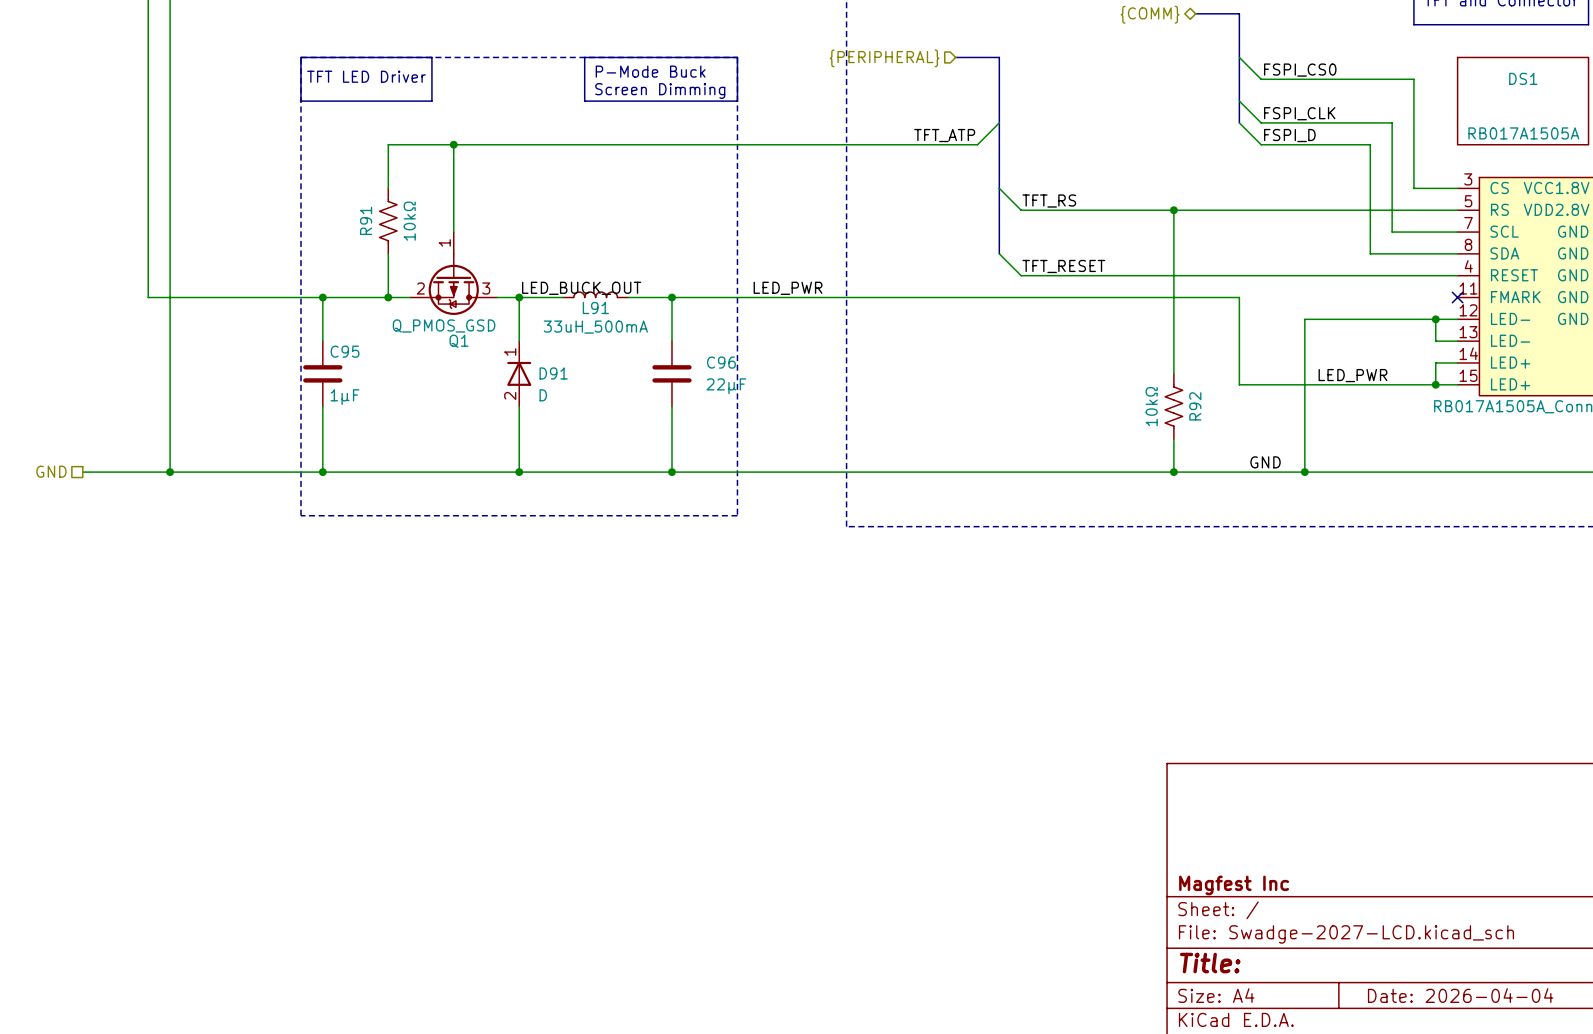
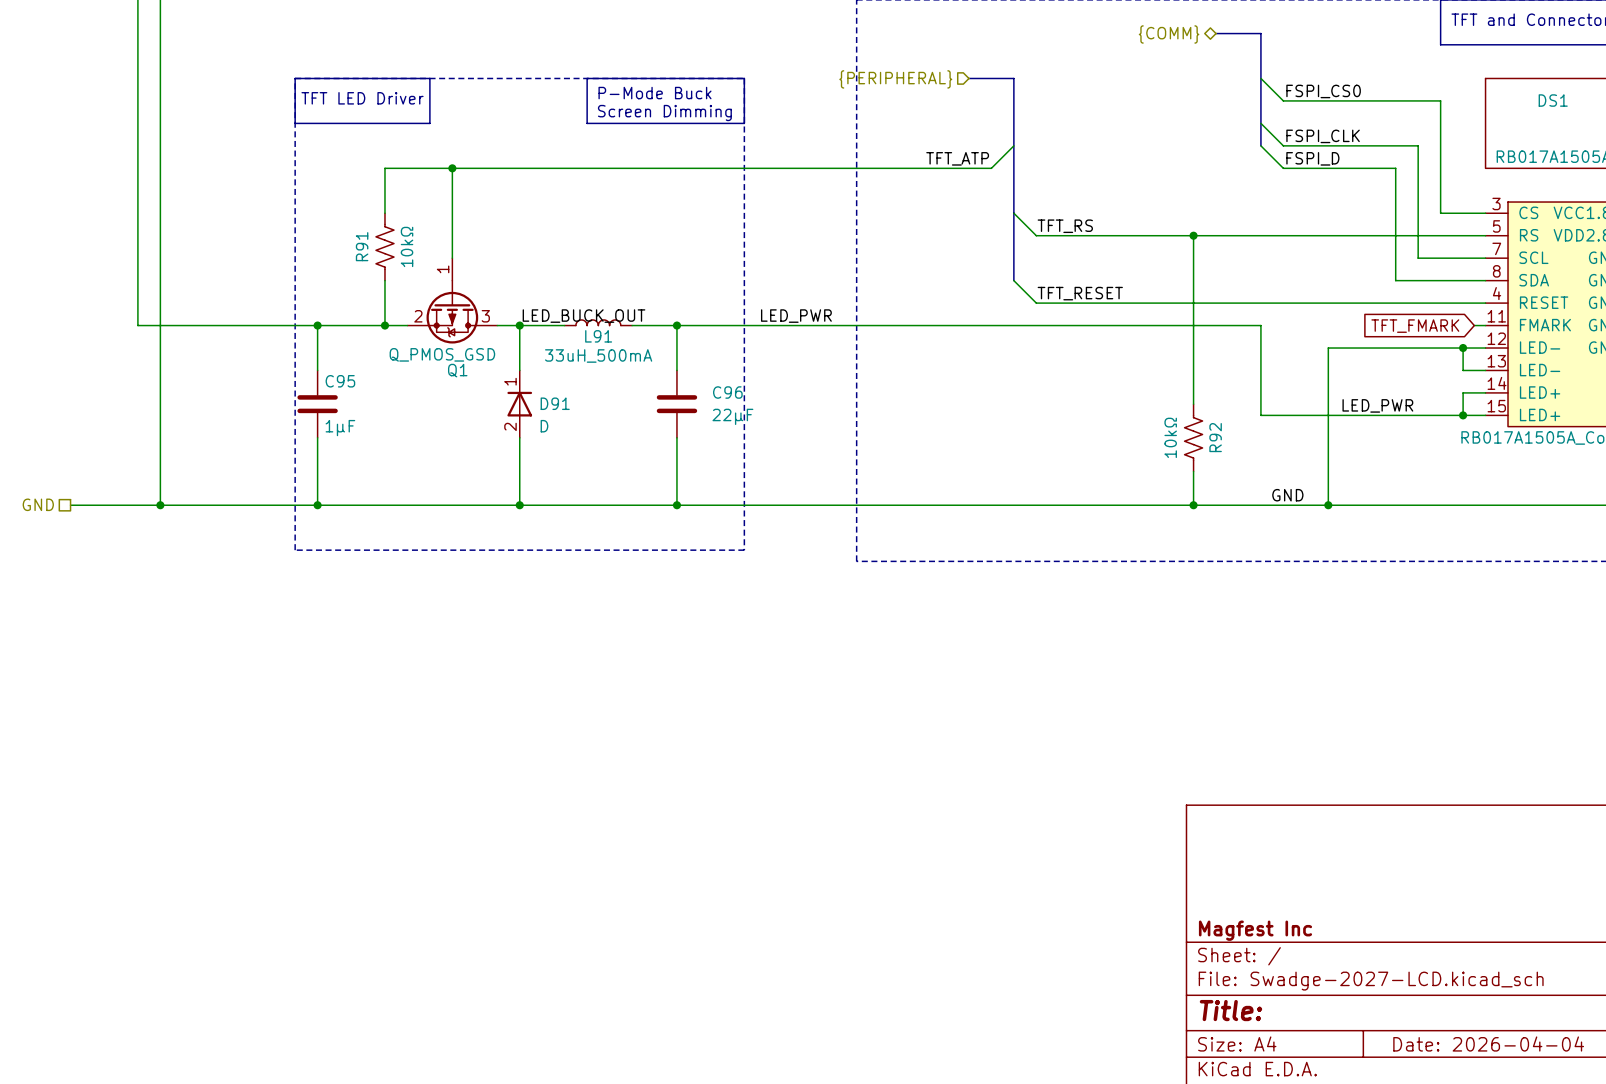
wire: none -> (1474, 325) (1485, 325)
no-connect mark: (1457, 297) -> none
global label: none -> TFT_FMARK (1415, 326)

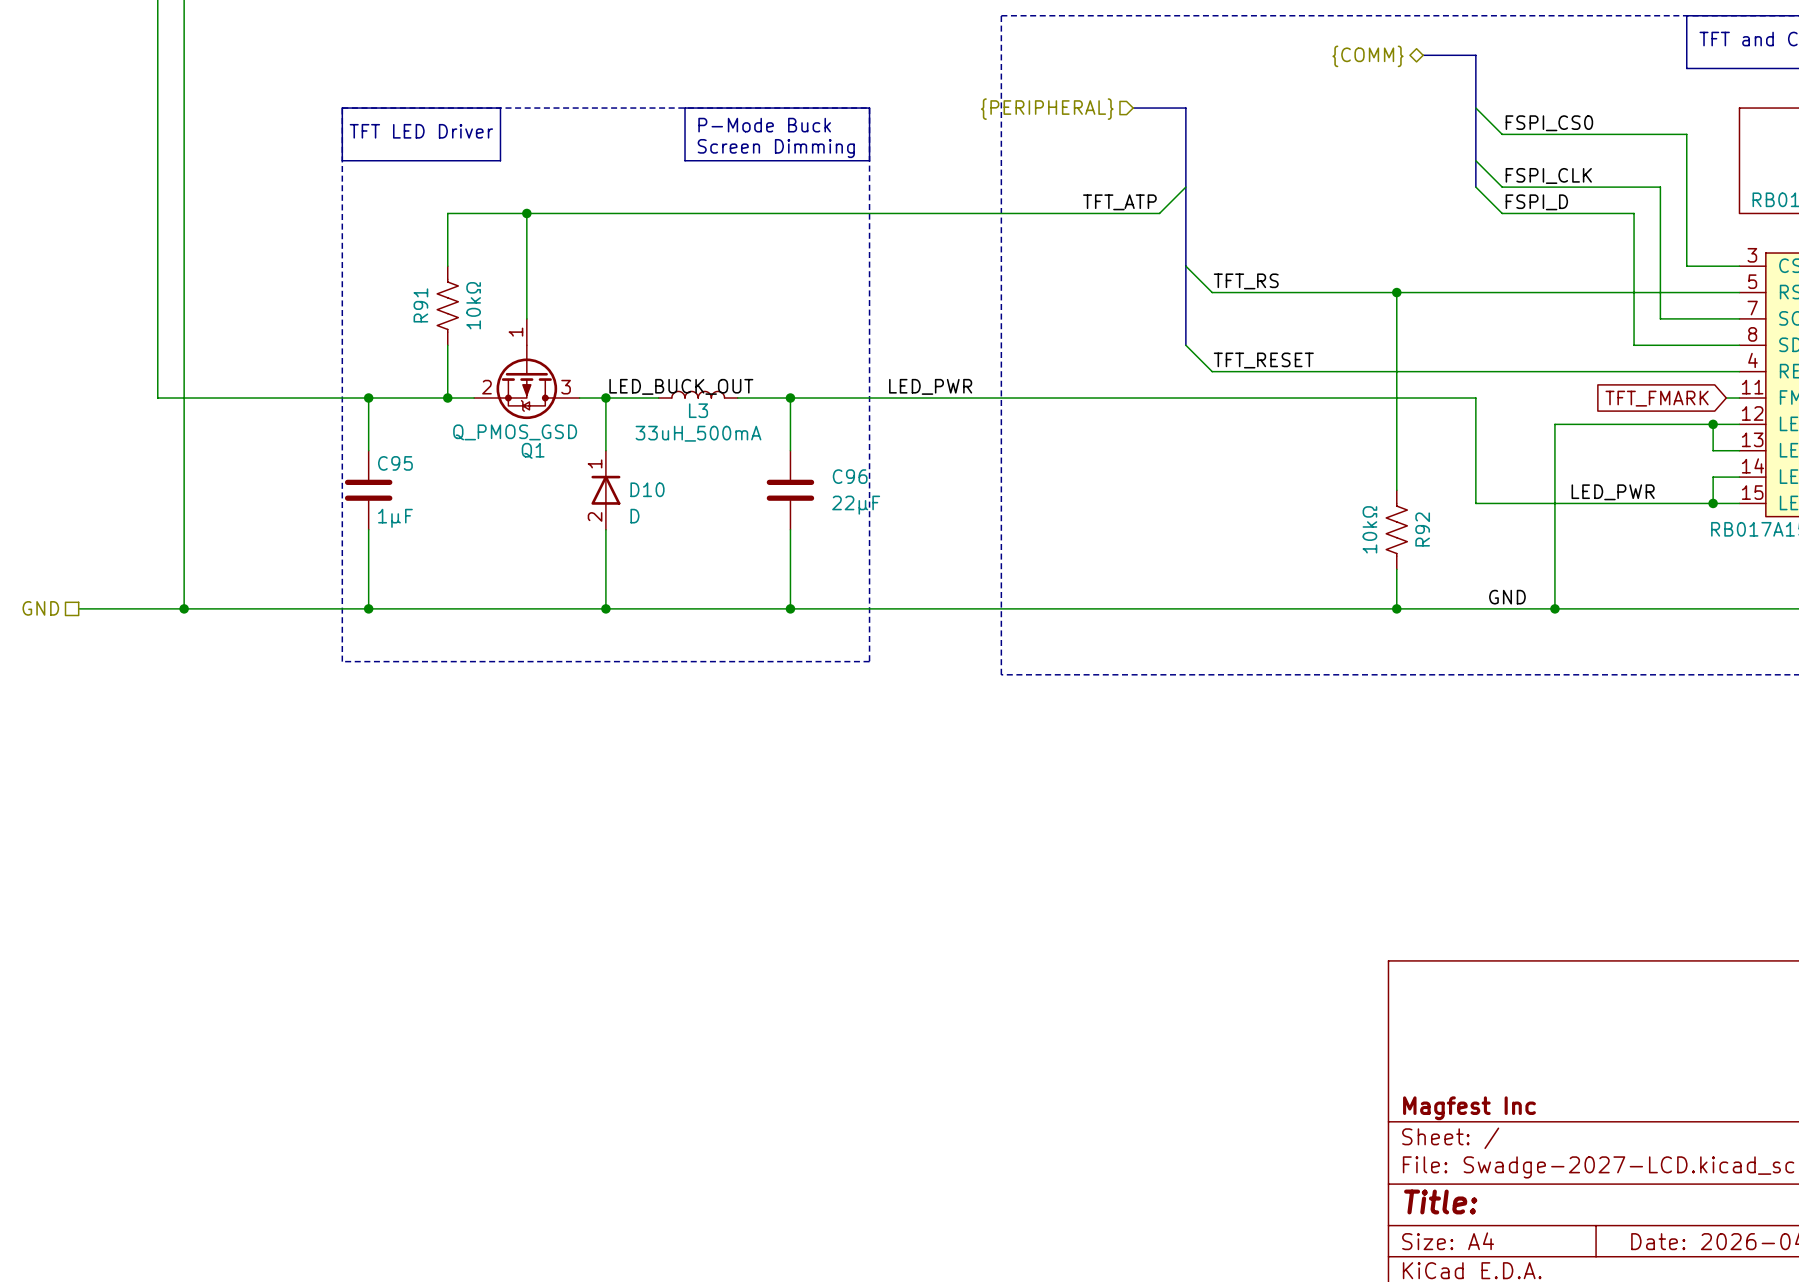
L91 name: L91 (598, 336) -> L3 (698, 410)
D91 name: D91 (555, 403) -> D10 (647, 489)

